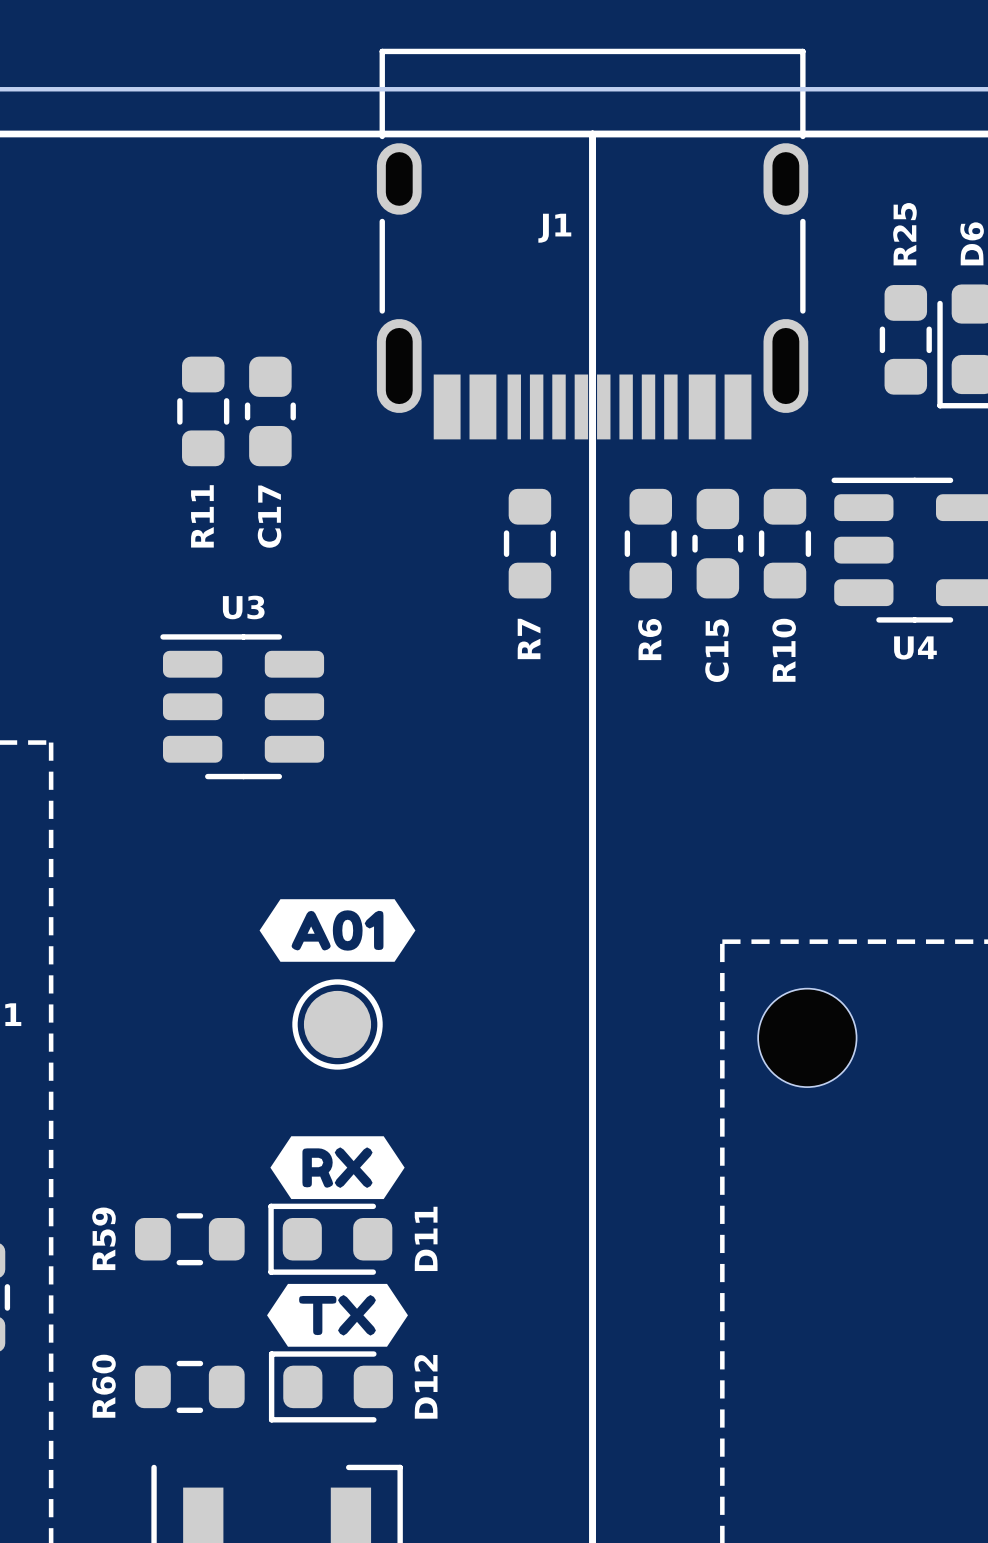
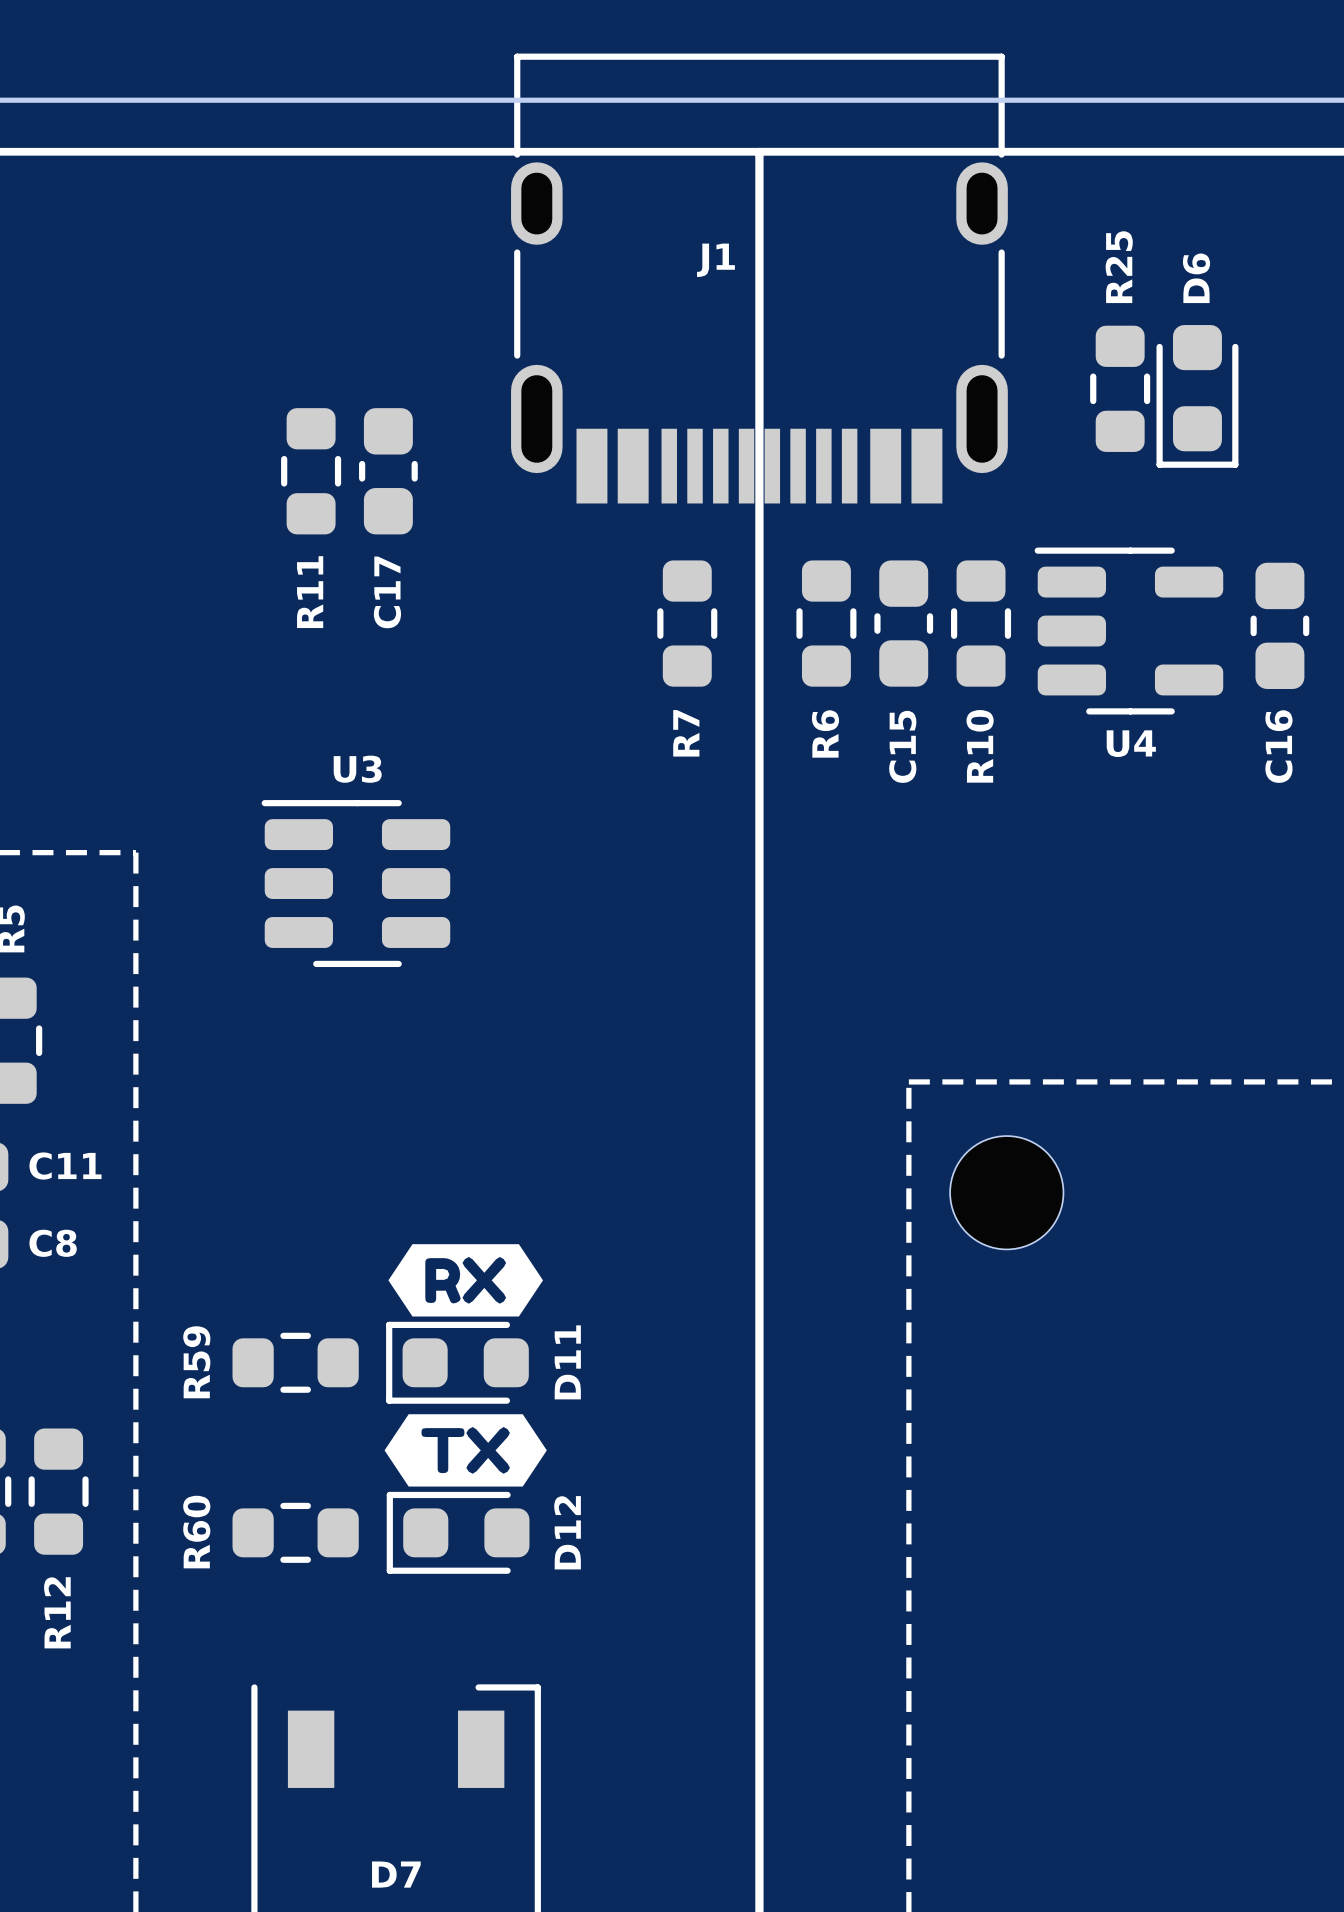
U3 position: (242, 706) -> (355, 883)
drawing: [259, 899, 416, 962] -> none
part: (337, 1024) -> none
drawing position: (337, 1167) -> (465, 1280)
R59 position: (189, 1239) -> (295, 1362)
D11 position: (330, 1239) -> (457, 1362)
drawing position: (337, 1315) -> (465, 1450)
R60 position: (189, 1386) -> (295, 1532)
D12 position: (330, 1386) -> (458, 1532)

